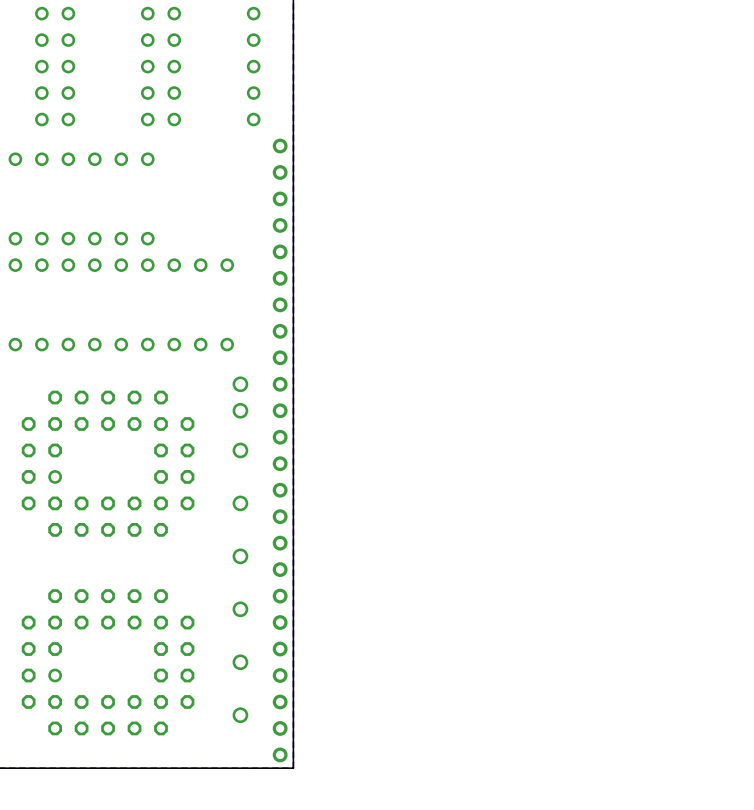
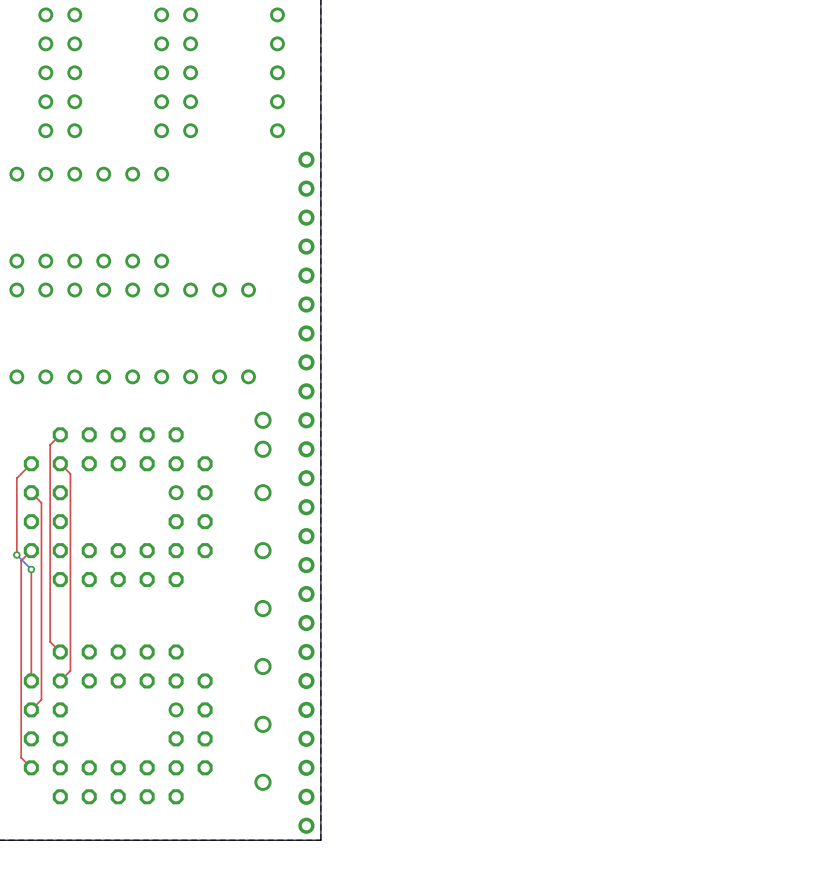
top track: none -> (60, 434) (50, 444) (50, 641) (60, 651)
top track: none -> (31, 463) (16, 478) (16, 554)
top track: none -> (60, 463) (70, 473) (70, 670) (60, 680)
top track: none -> (31, 492) (41, 502) (41, 699) (31, 709)
part rotation: 0° (108, 463) -> 180° (118, 507)
top track: none -> (31, 550) (21, 560) (21, 757) (31, 767)
bottom track: none -> (16, 554) (31, 569)
via: none -> (16, 554)
top track: none -> (31, 569) (31, 680)
via: none -> (31, 569)
part rotation: 0° (108, 662) -> 180° (118, 724)

